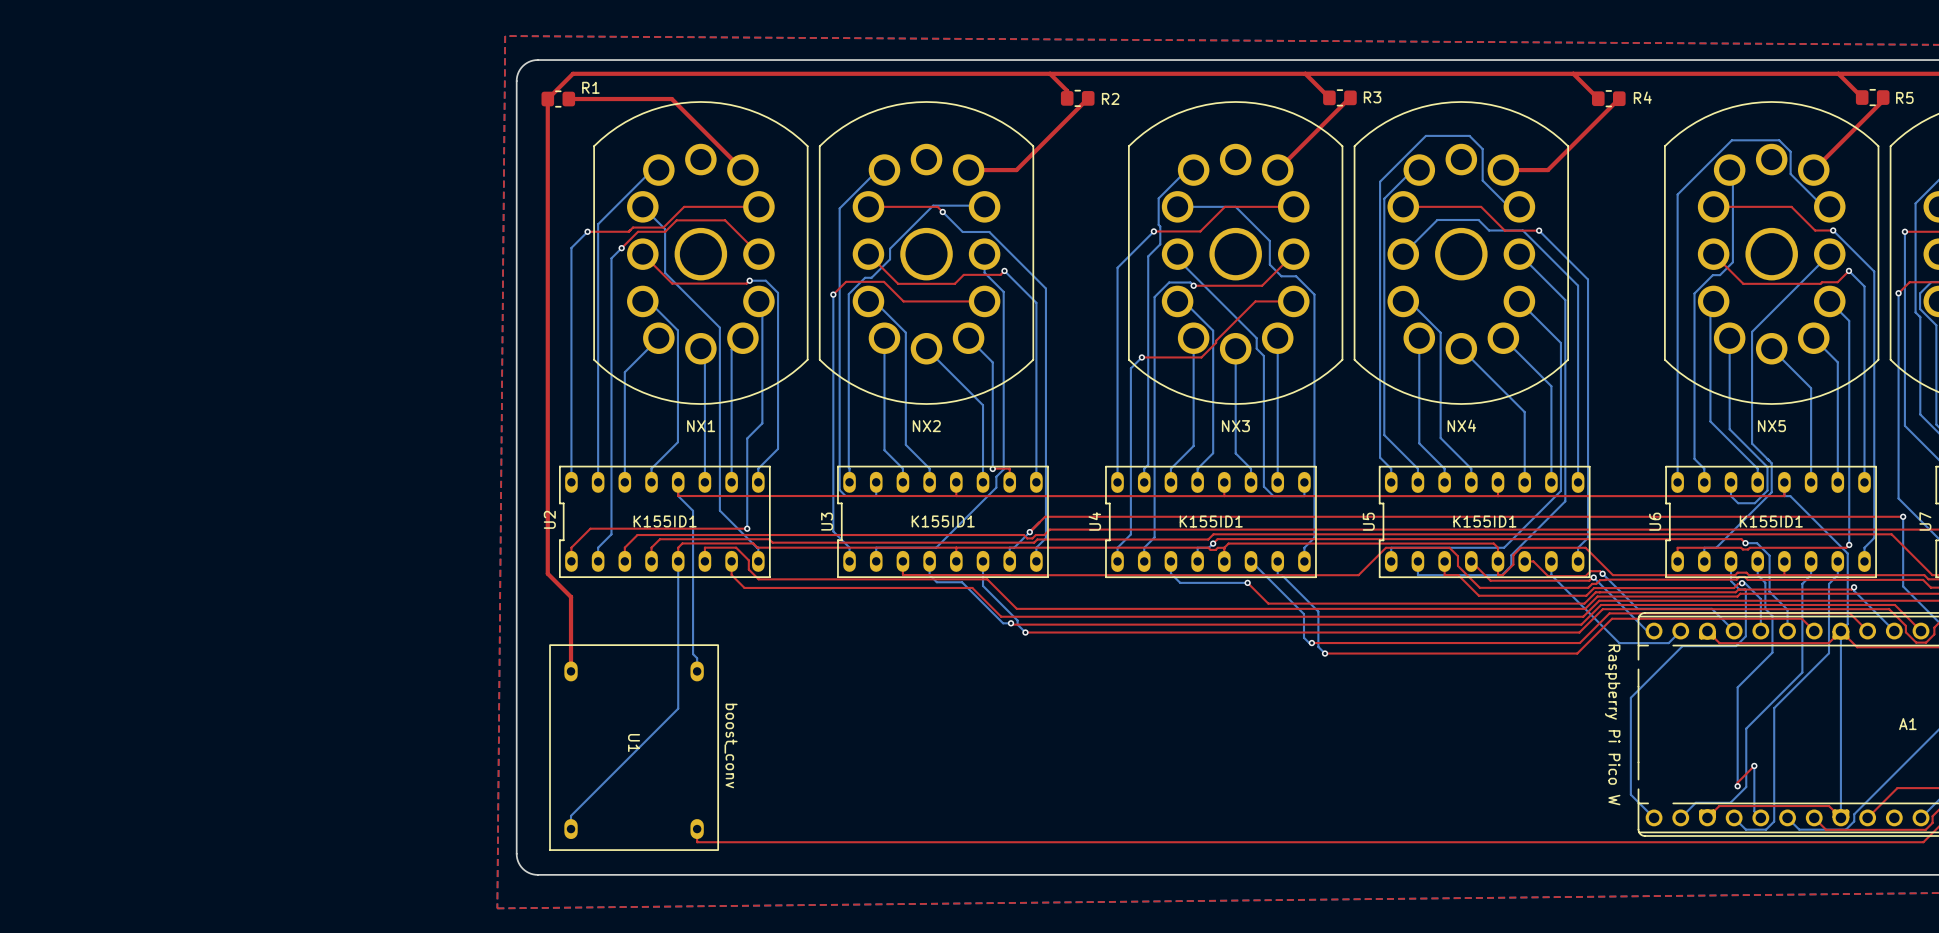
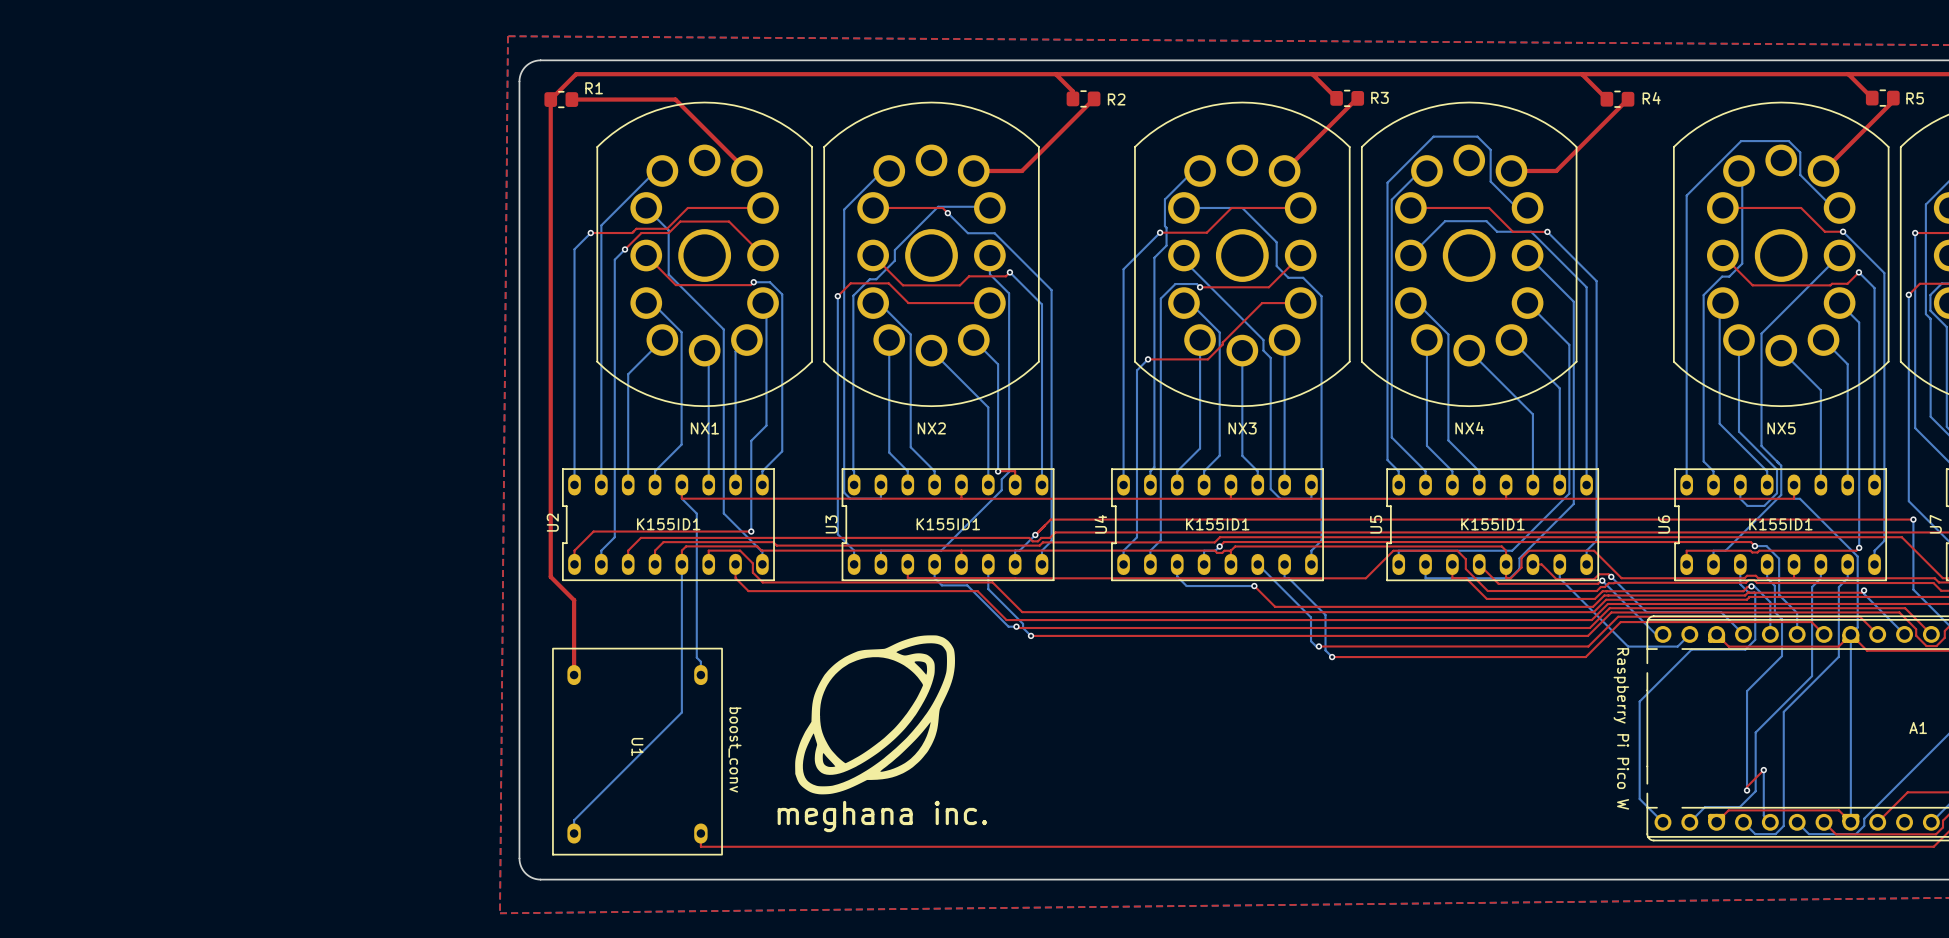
drawing: none -> [795, 635, 955, 795]
text: none -> meghana inc. (882, 816)

